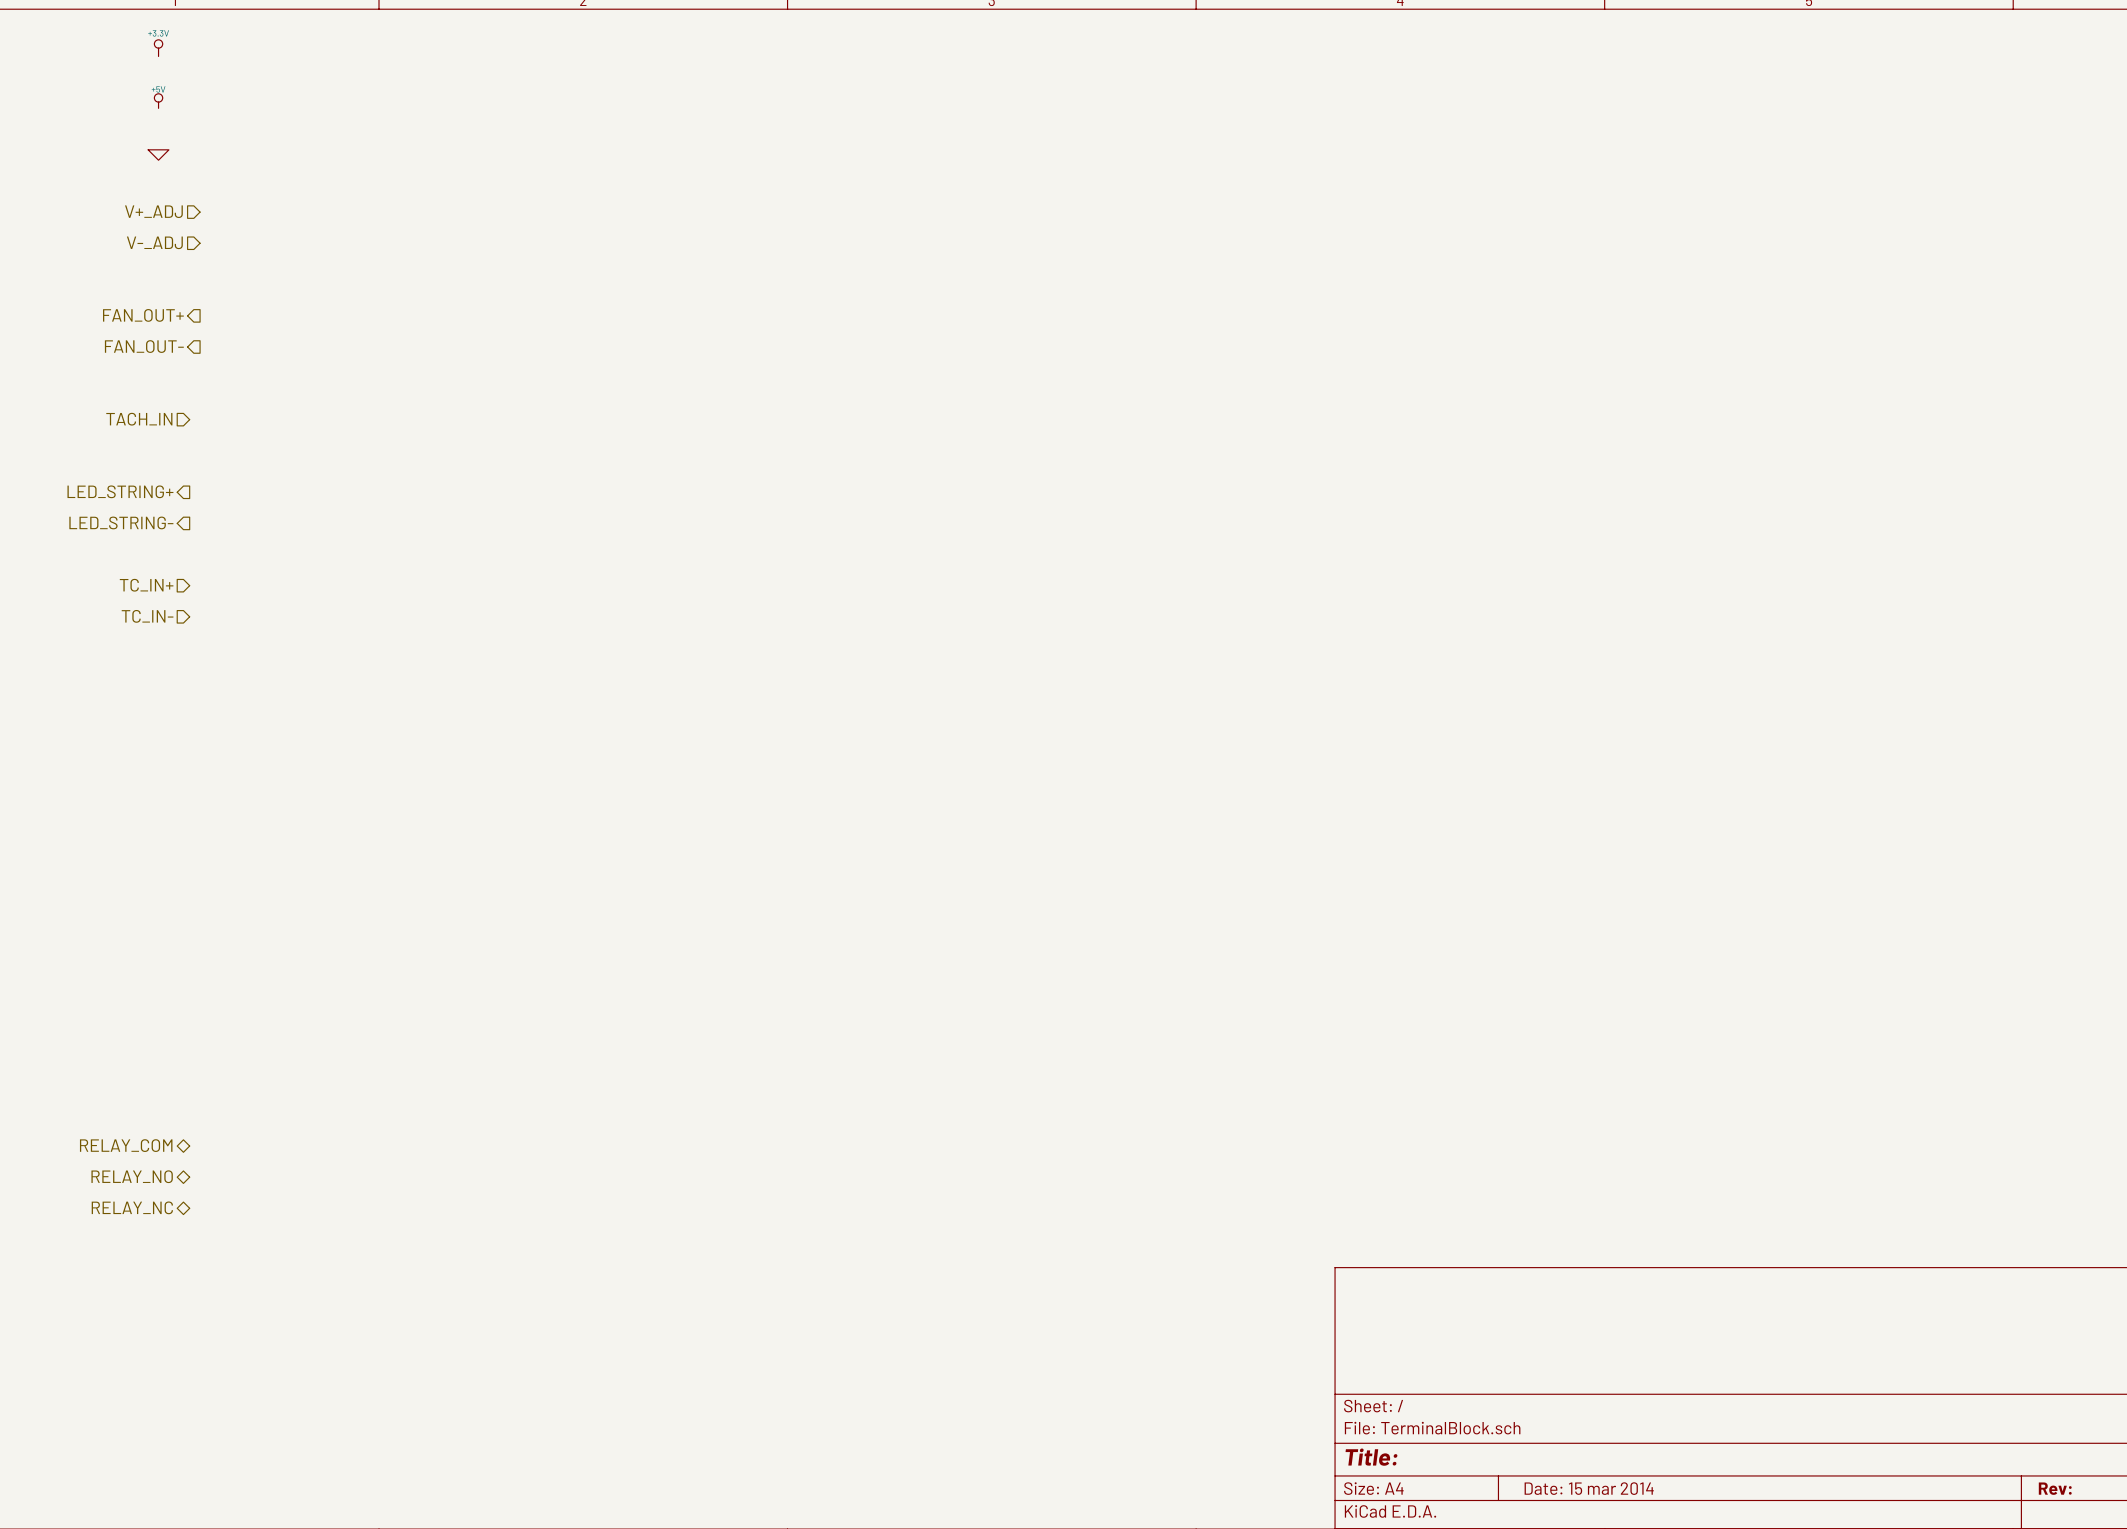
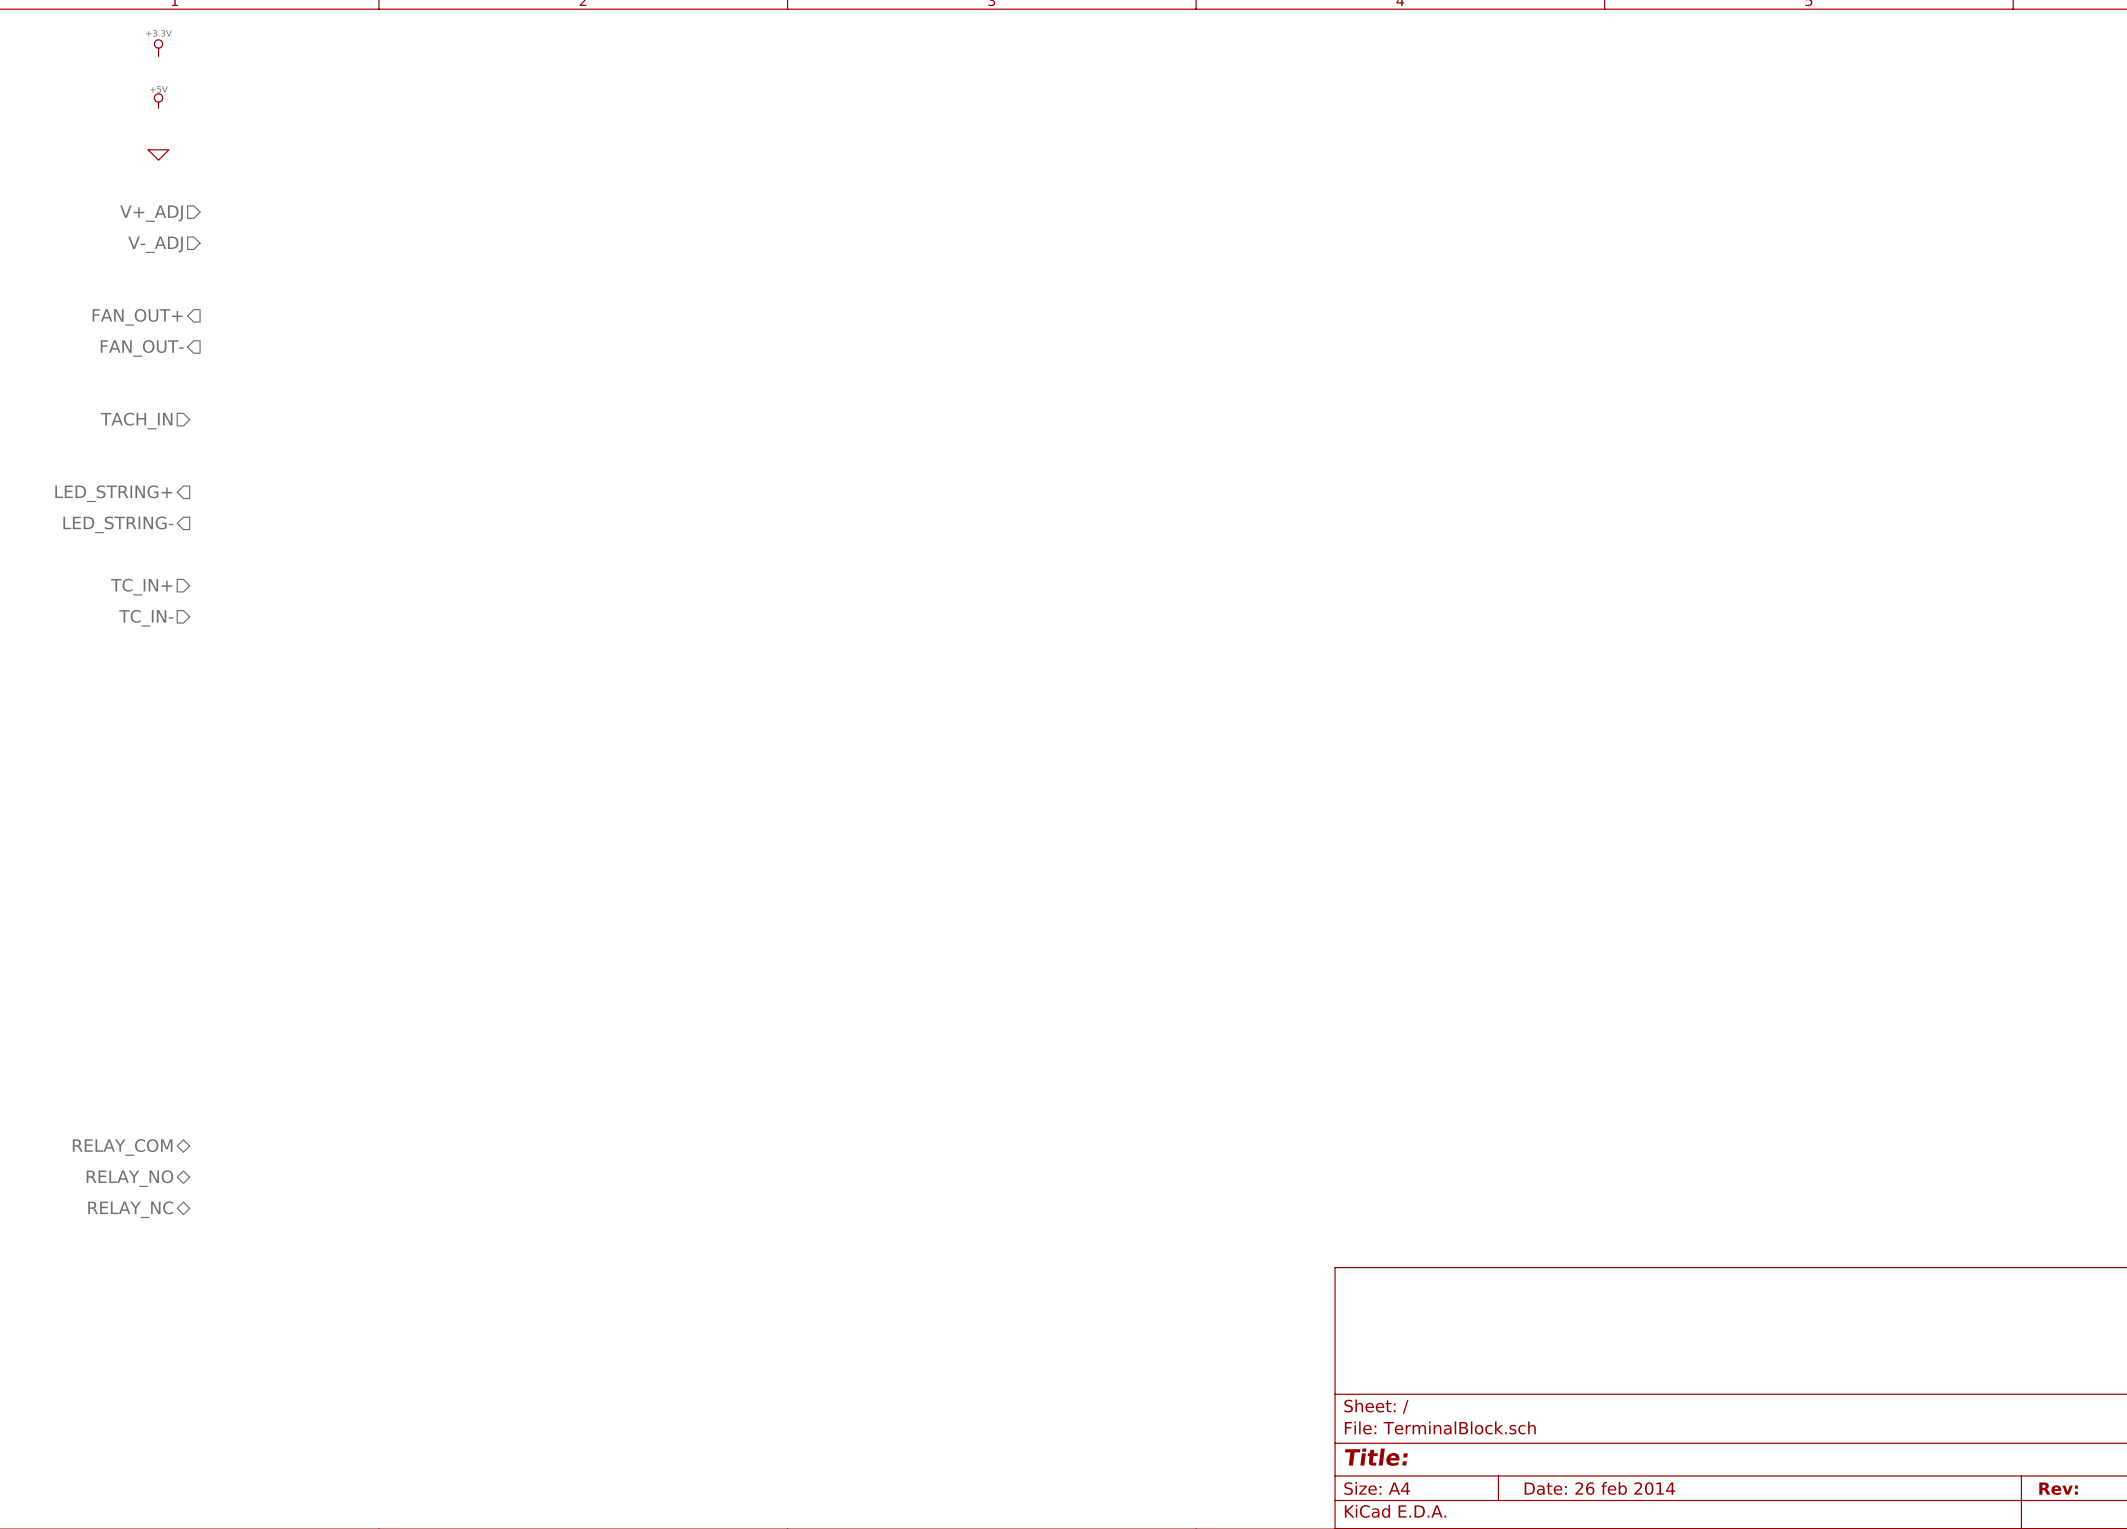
title block: Date: 15 mar 2014 (1589, 1488) -> Date: 26 feb 2014 (1599, 1488)

